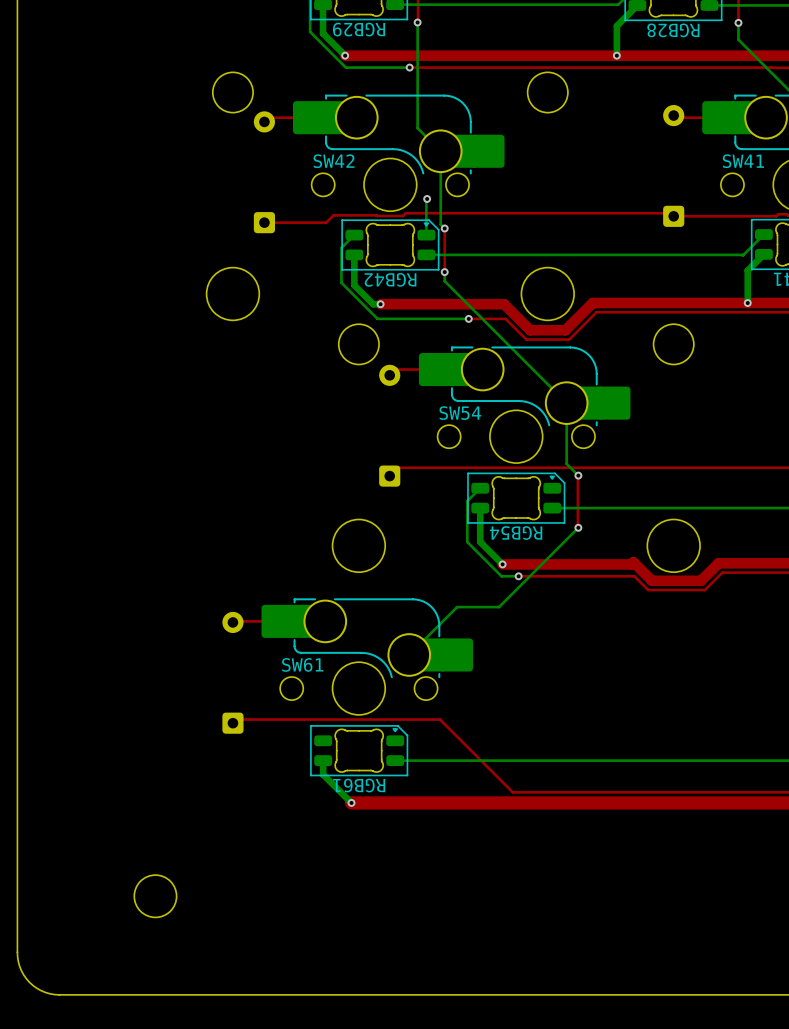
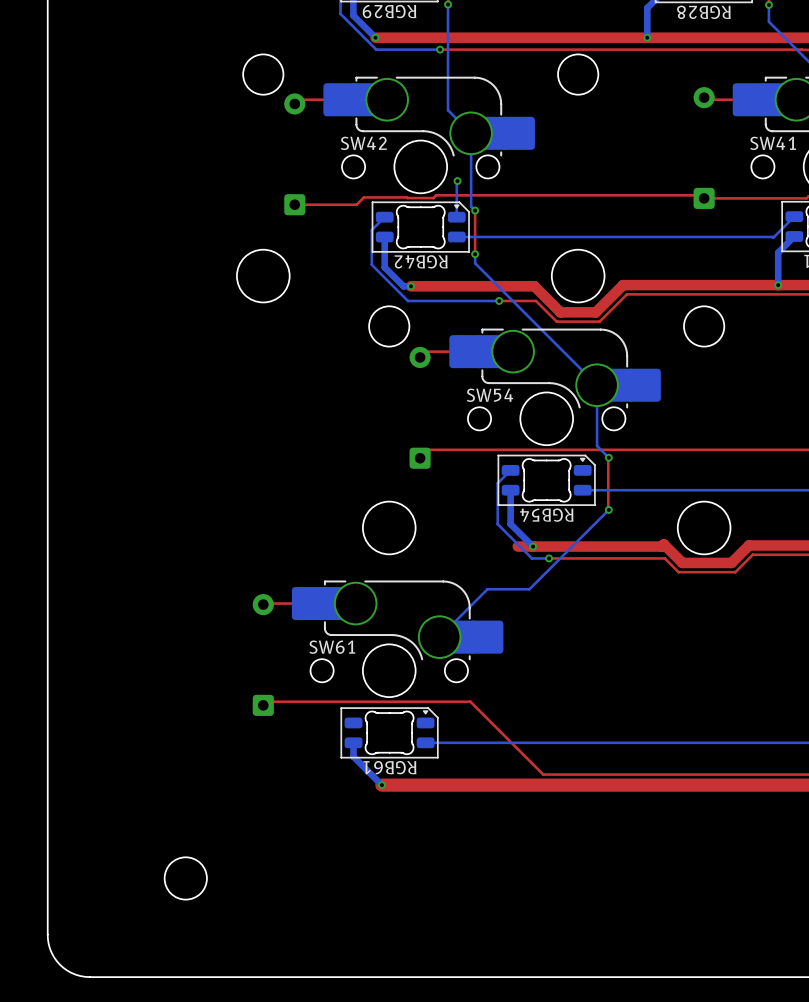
top track: none -> (533, 546) (517, 546)

